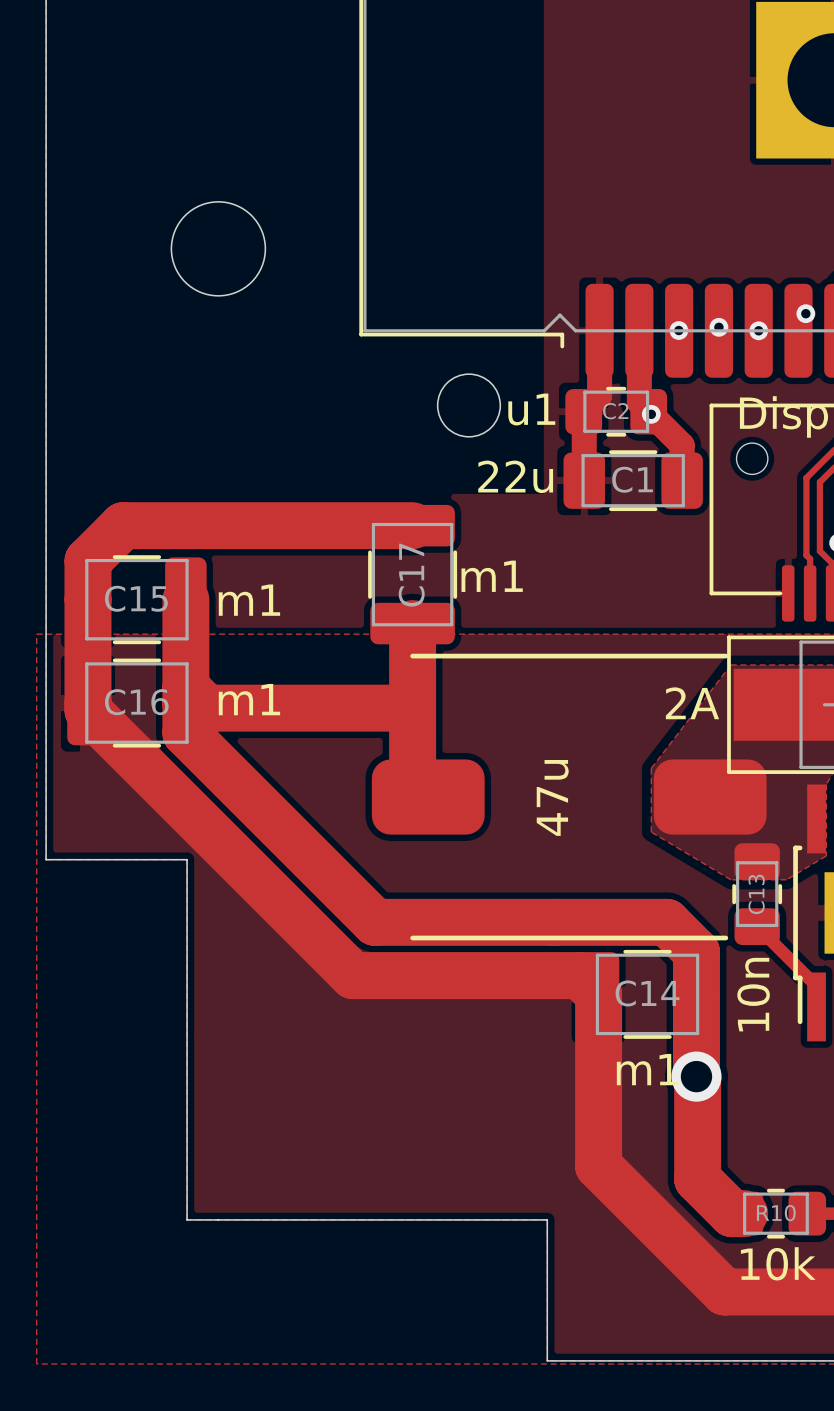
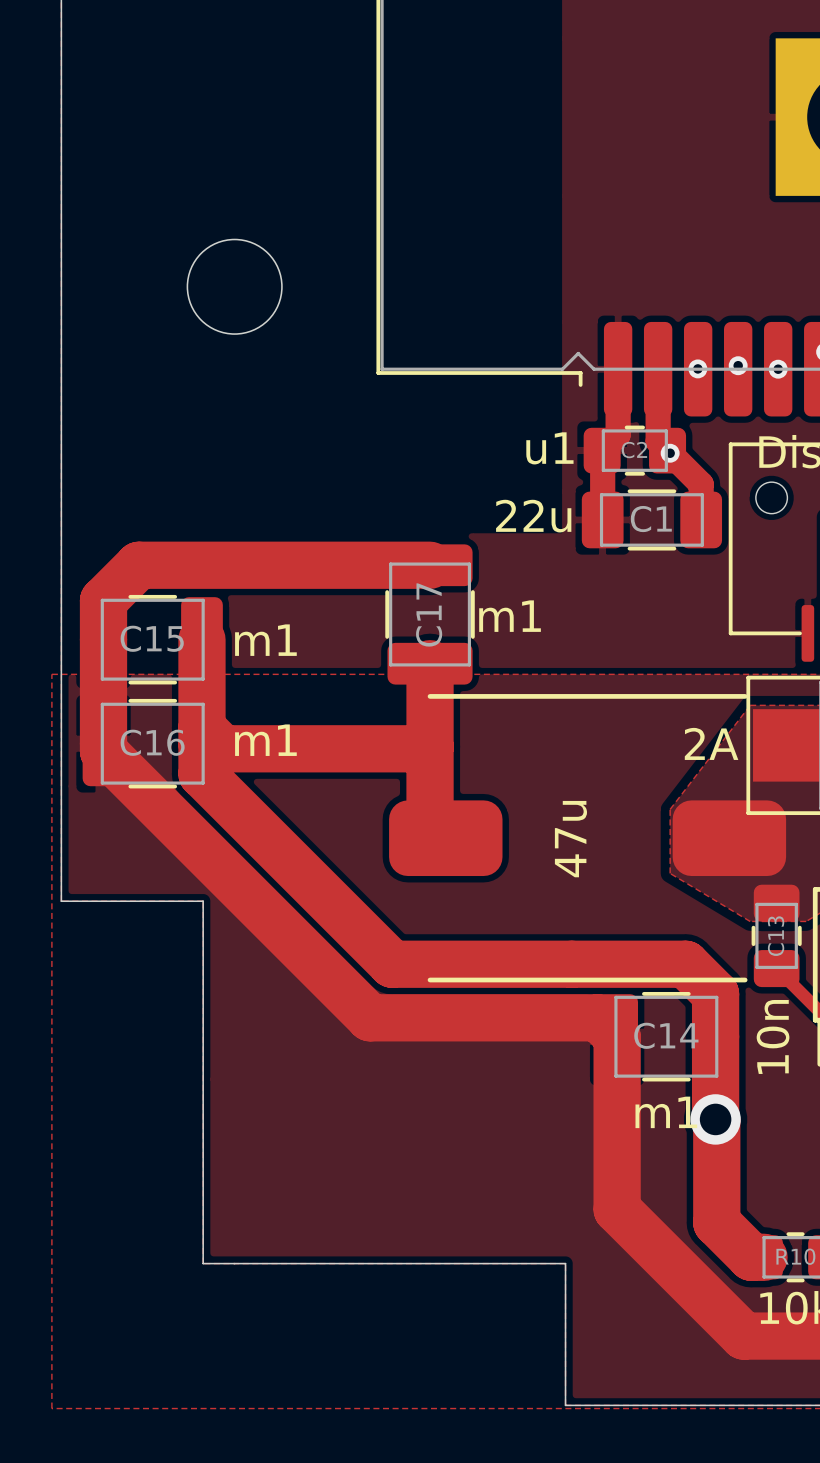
round board edge: [436, 373, 502, 438] -> none

